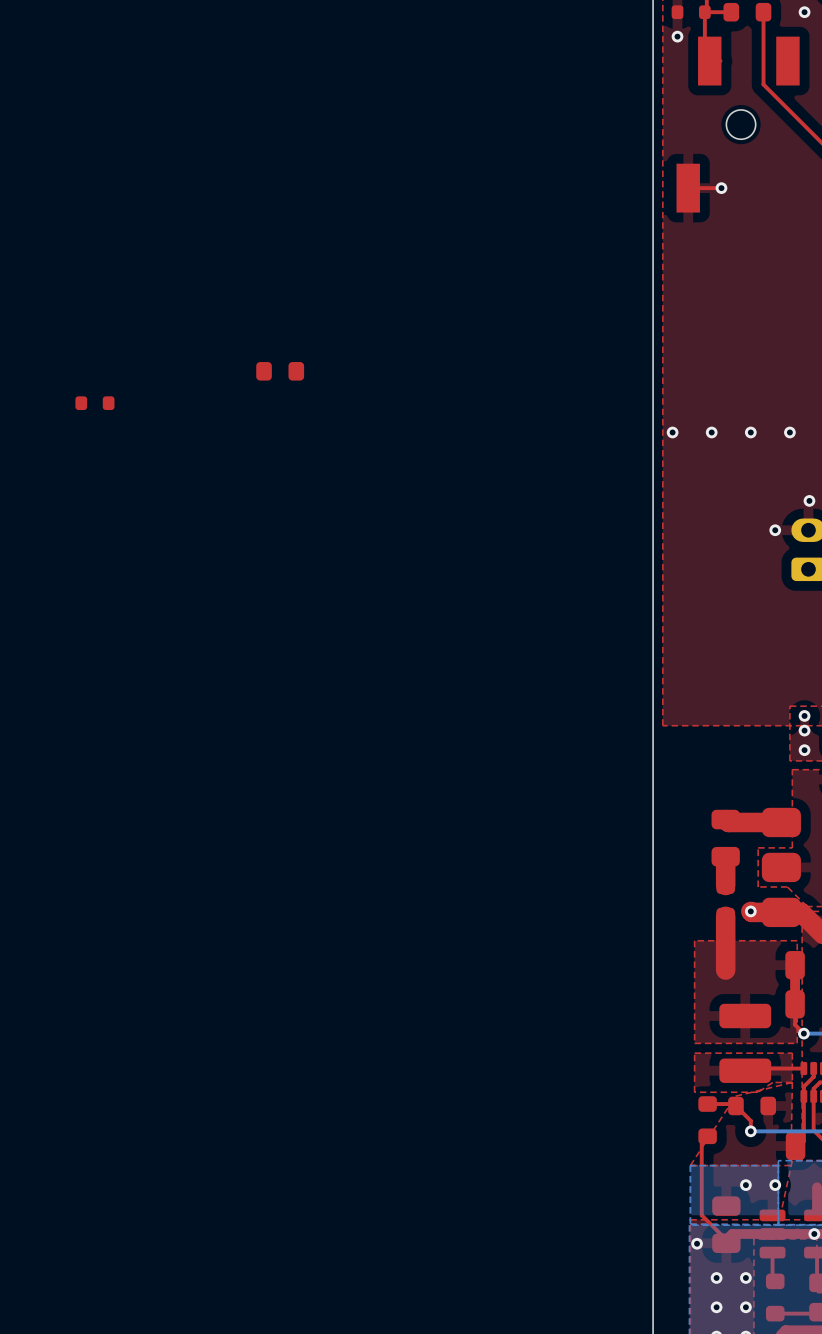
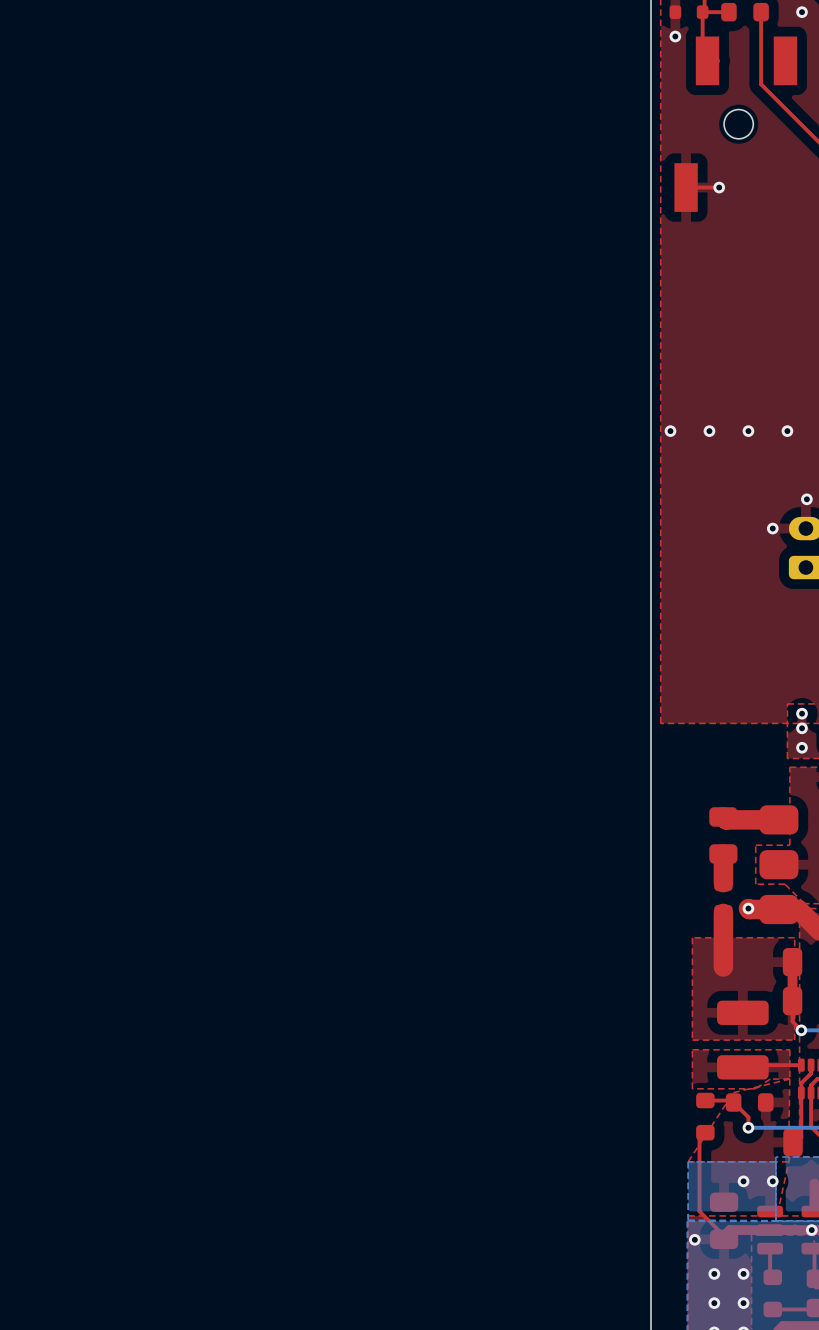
part: (280, 371) -> none
part: (94, 403) -> none

